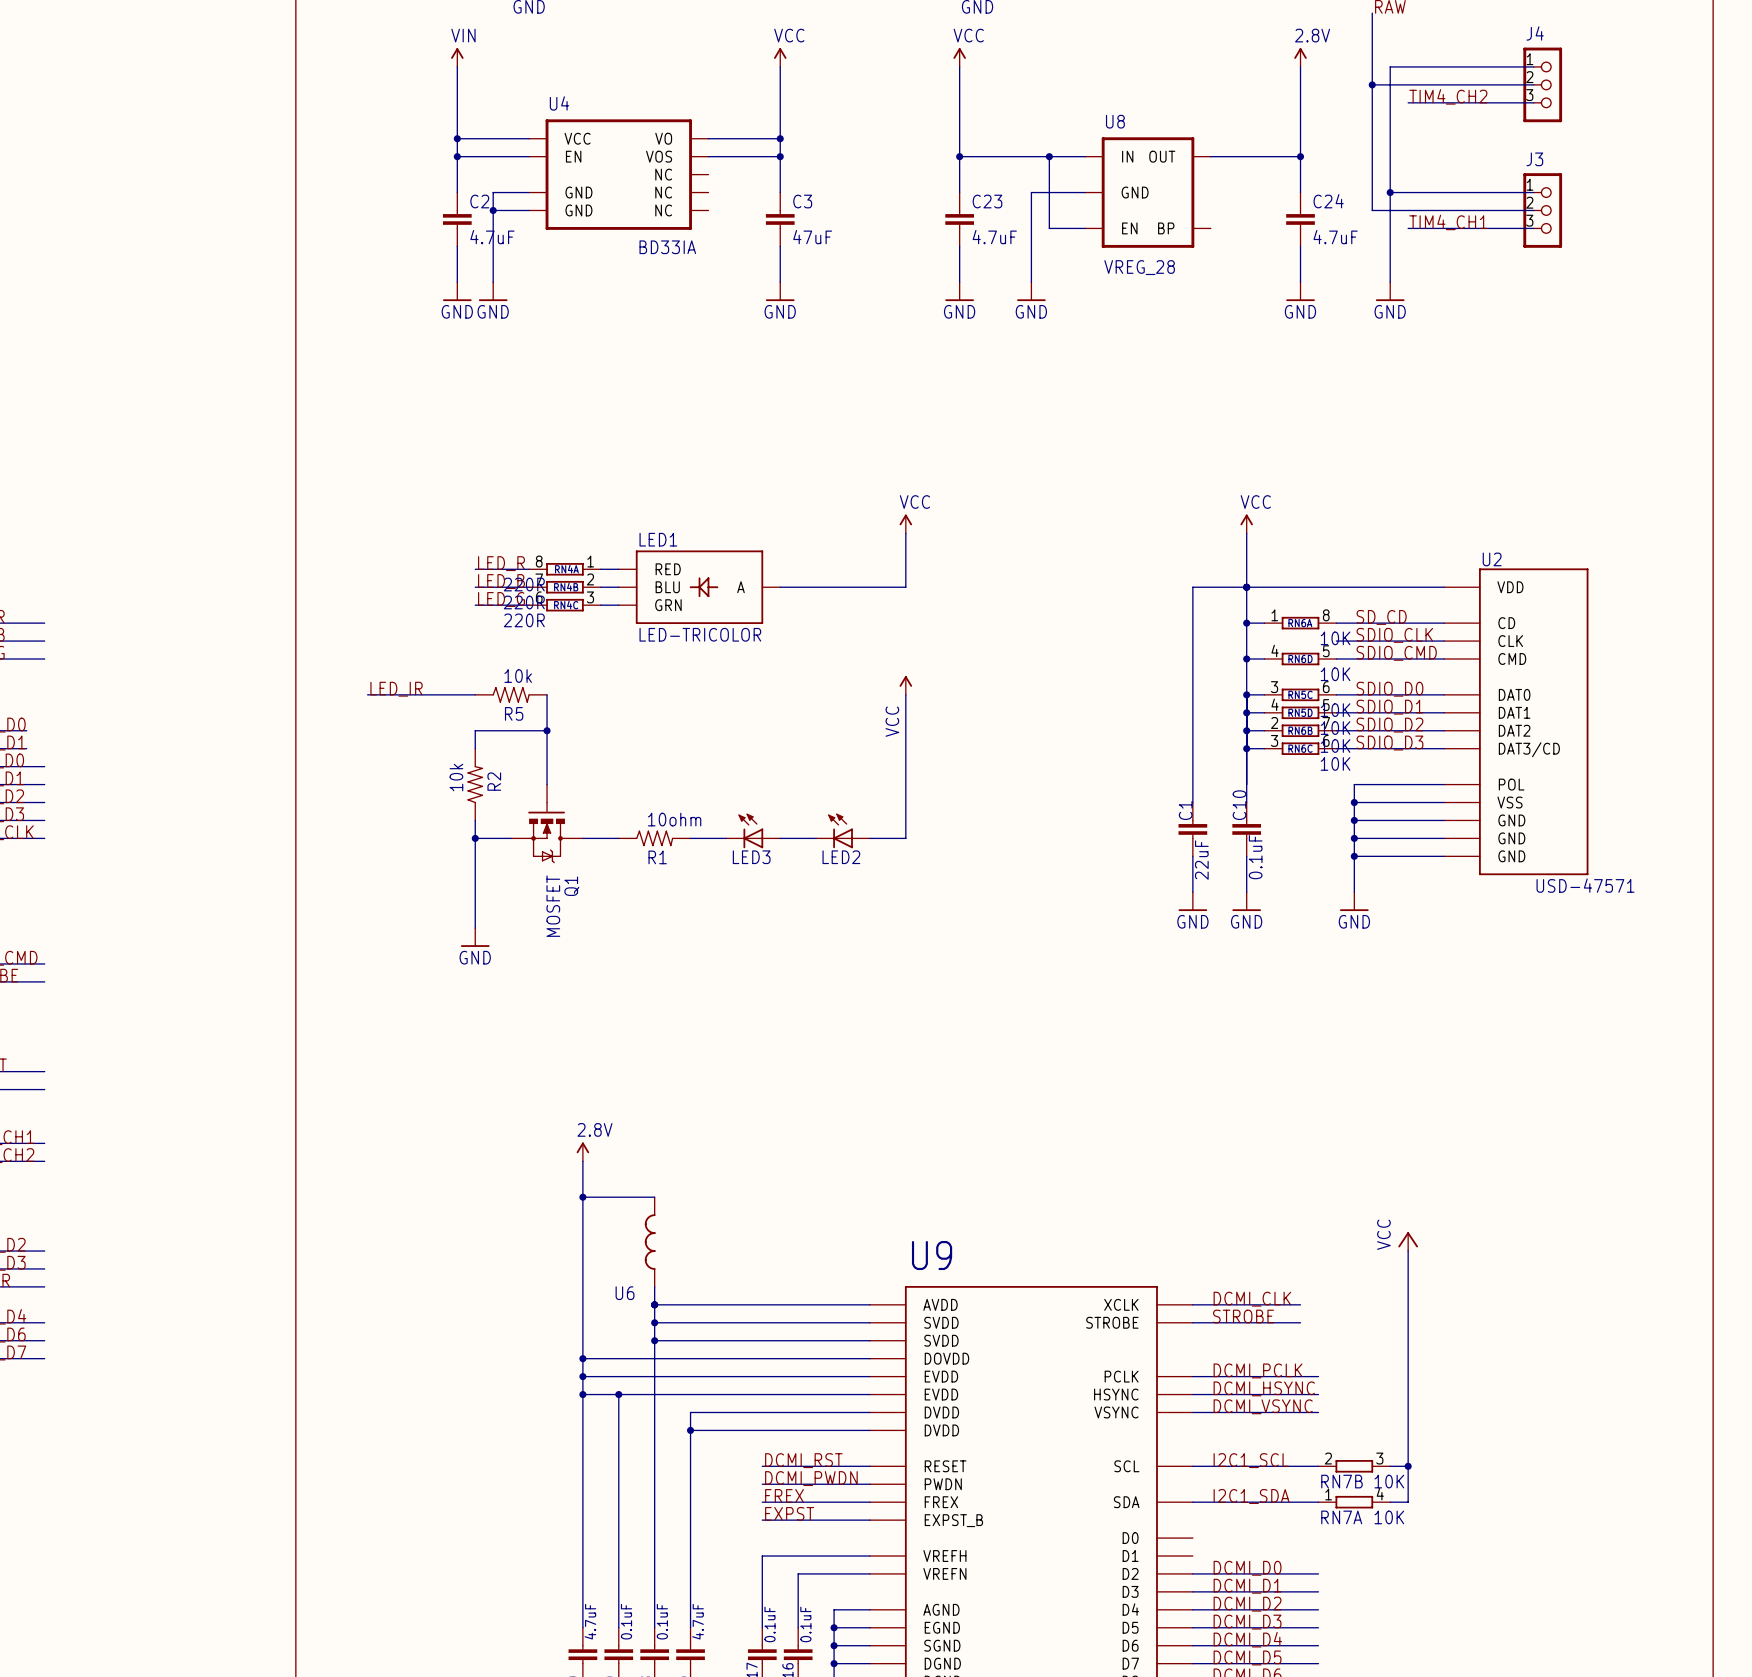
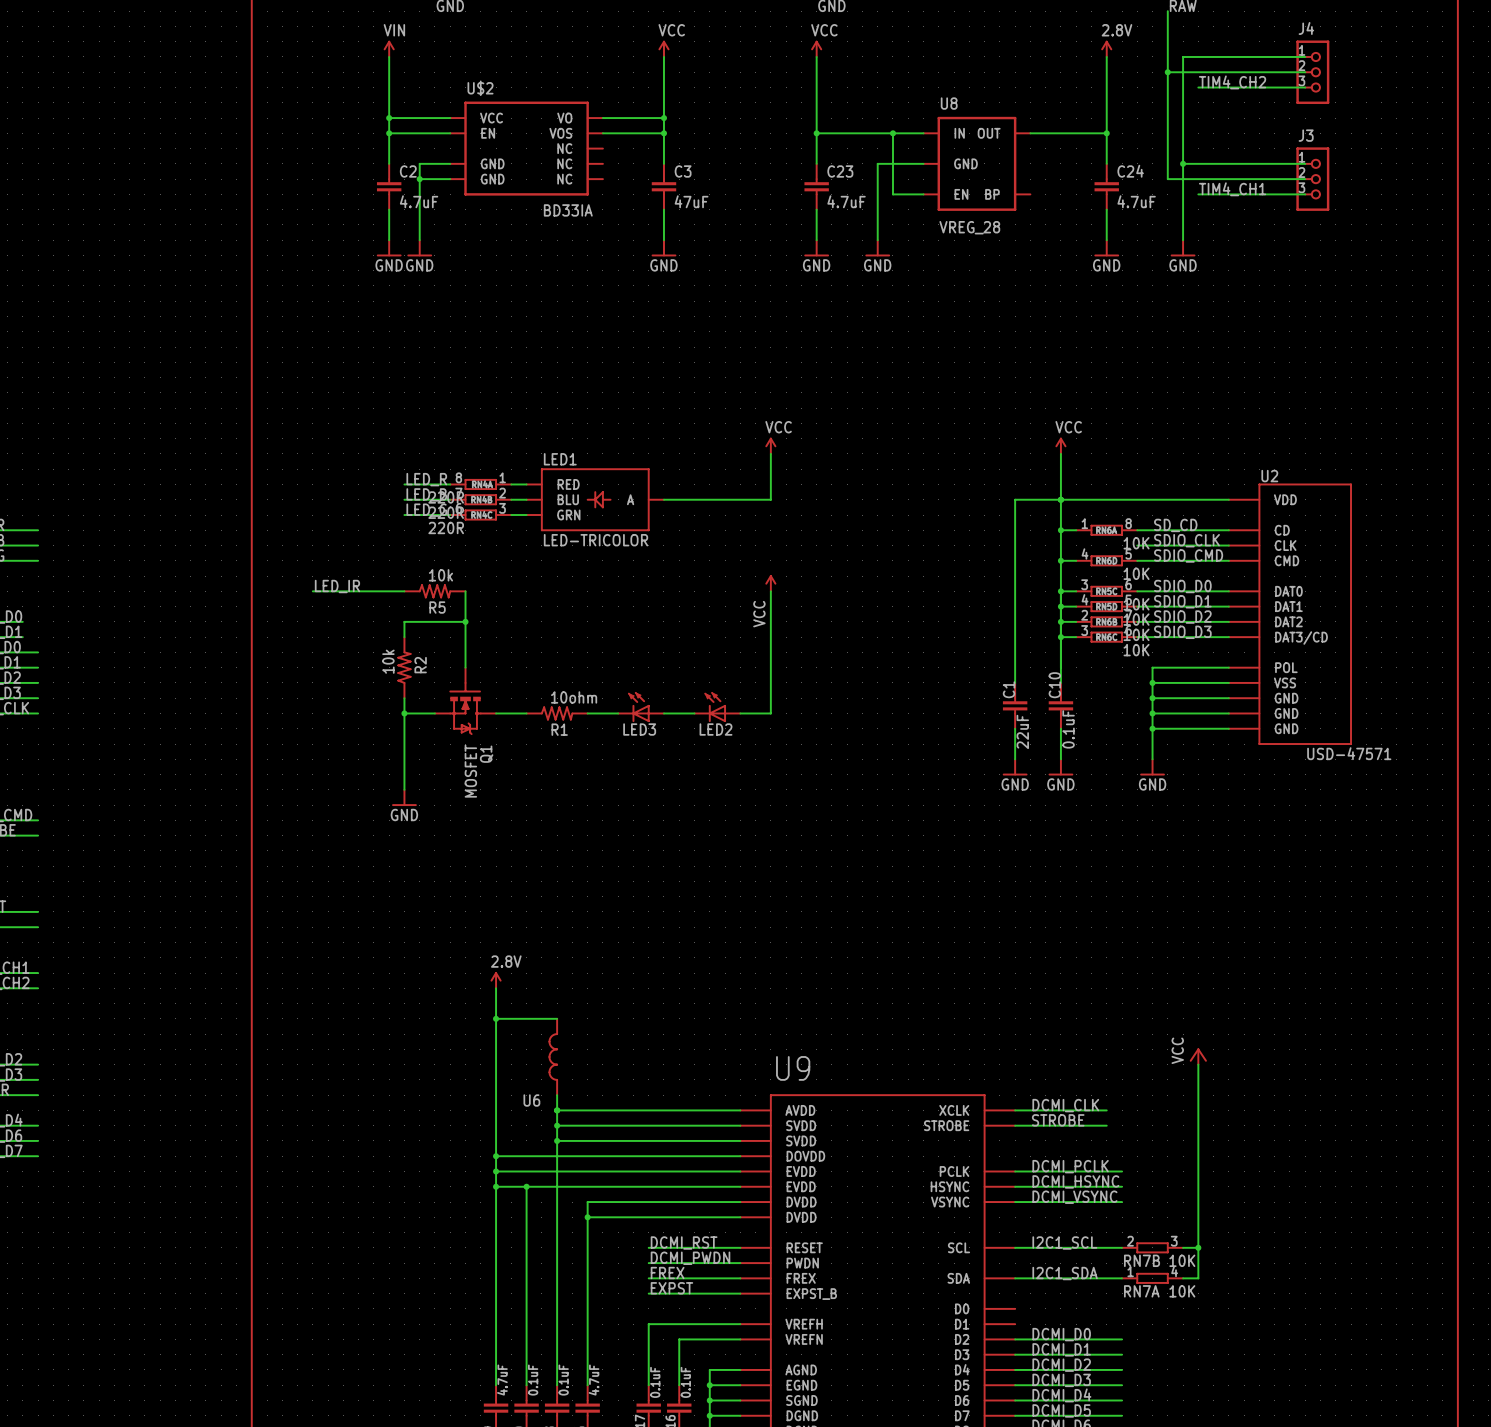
U4 name: U4 (559, 103) -> U$2 (480, 88)

